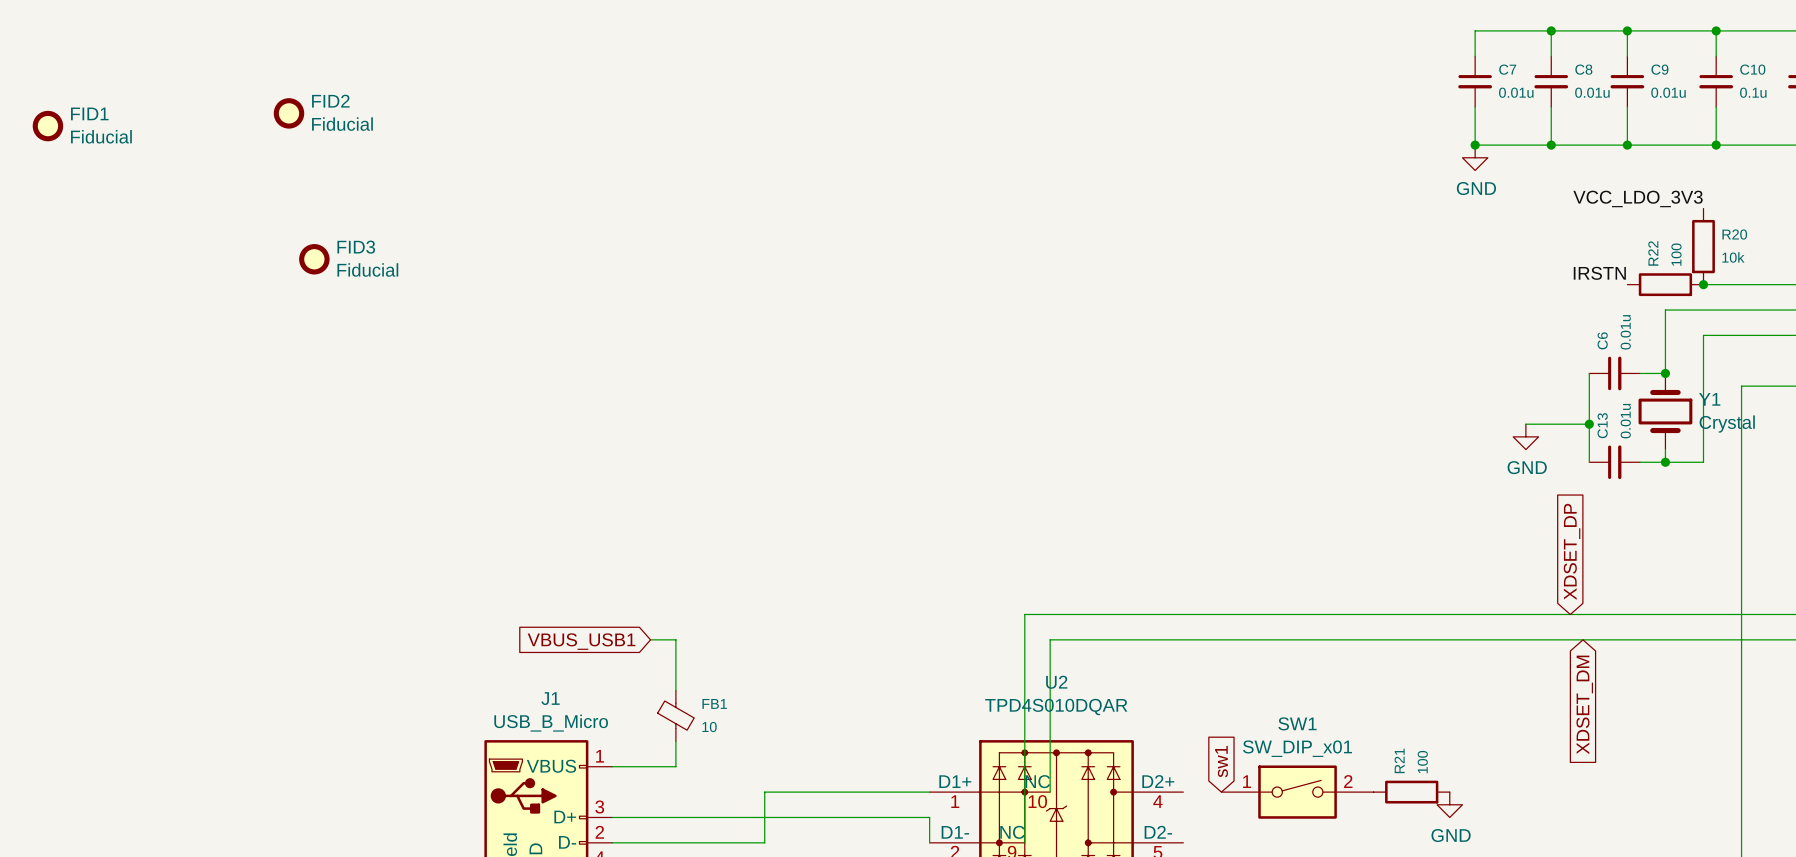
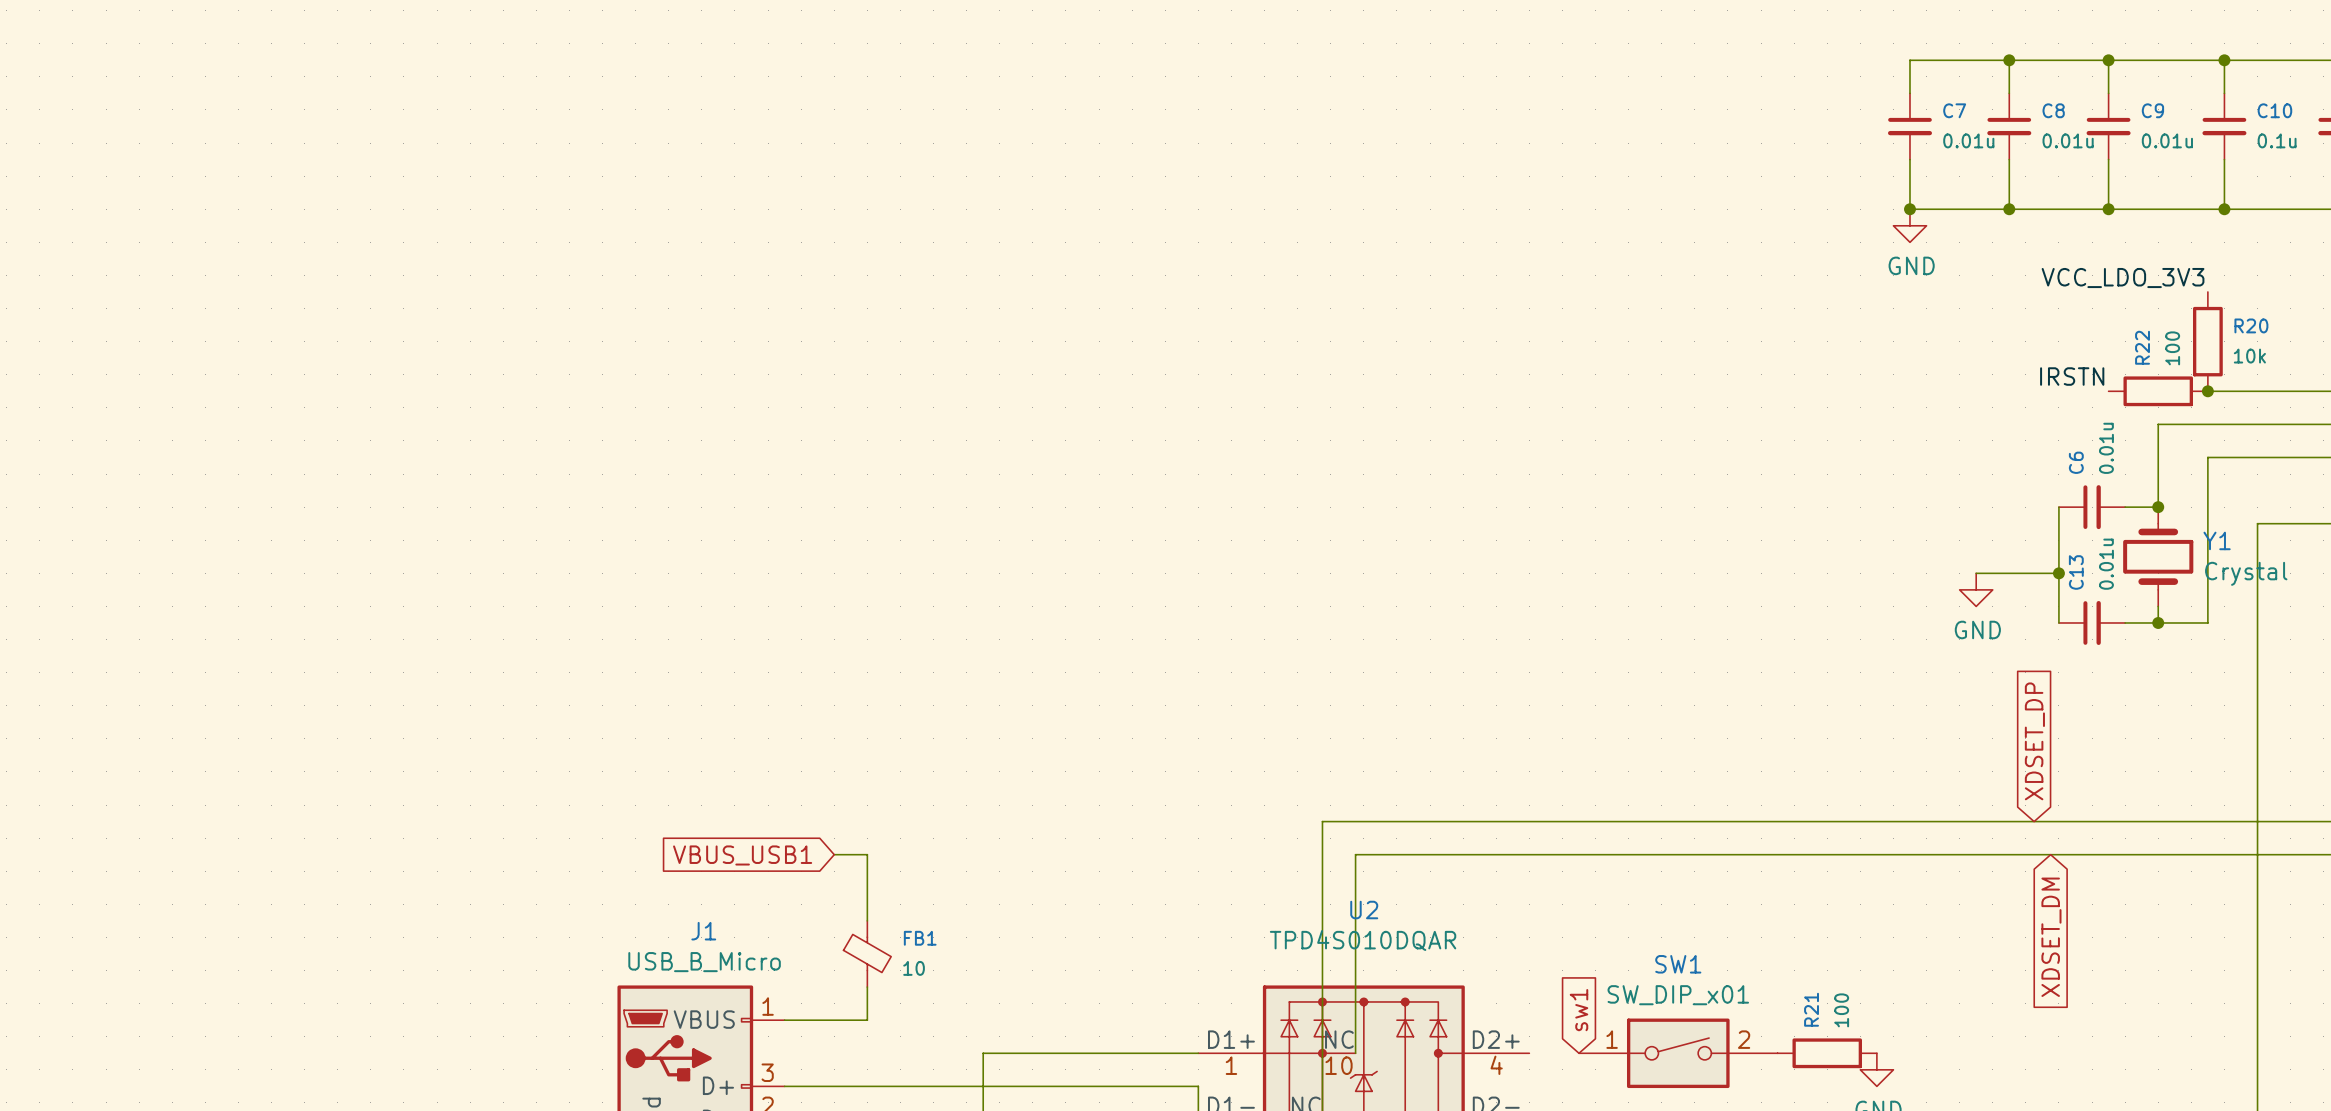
FID2: Fiducial (288, 113) -> none
FID1: Fiducial (47, 126) -> none
FID3: Fiducial (314, 259) -> none

